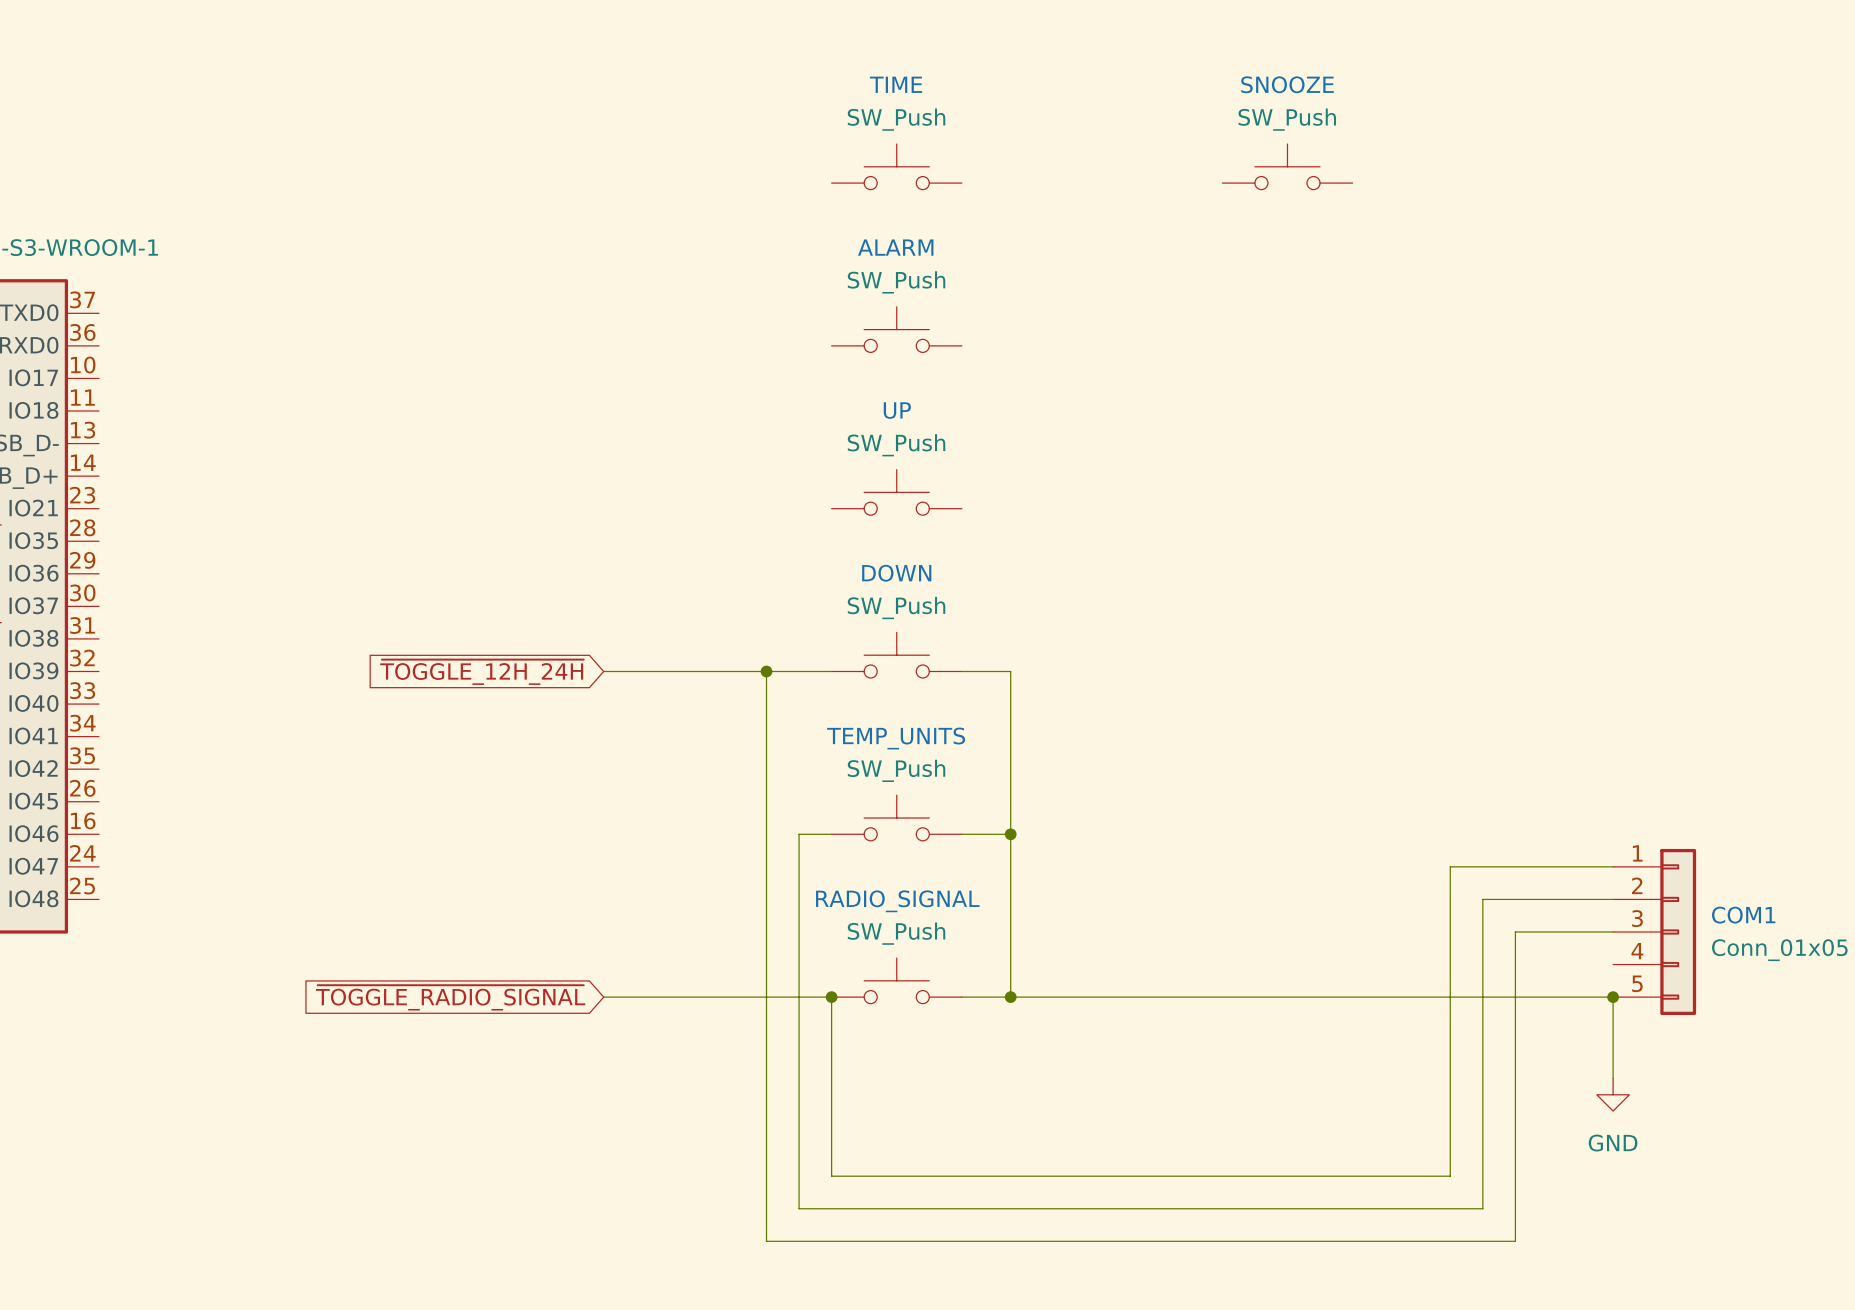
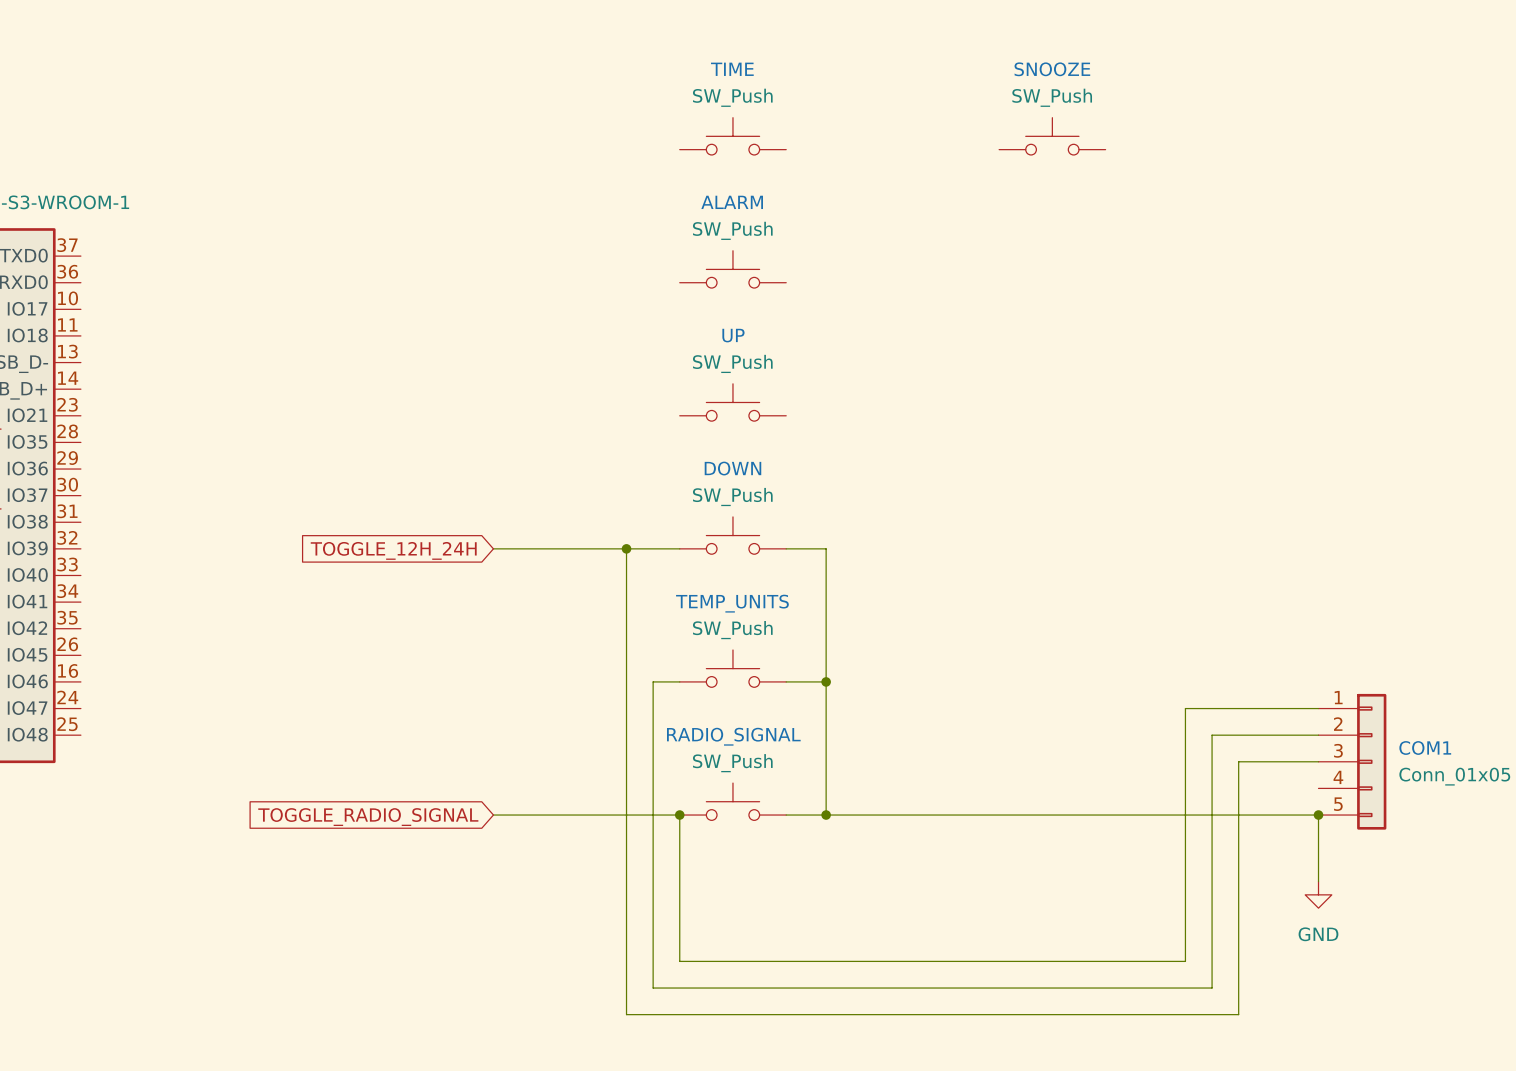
global label: ~{TOGGLE_12H_24H} (481, 672) -> TOGGLE_12H_24H (393, 550)
global label: ~{TOGGLE_RADIO_SIGNAL} (450, 997) -> TOGGLE_RADIO_SIGNAL (368, 817)

